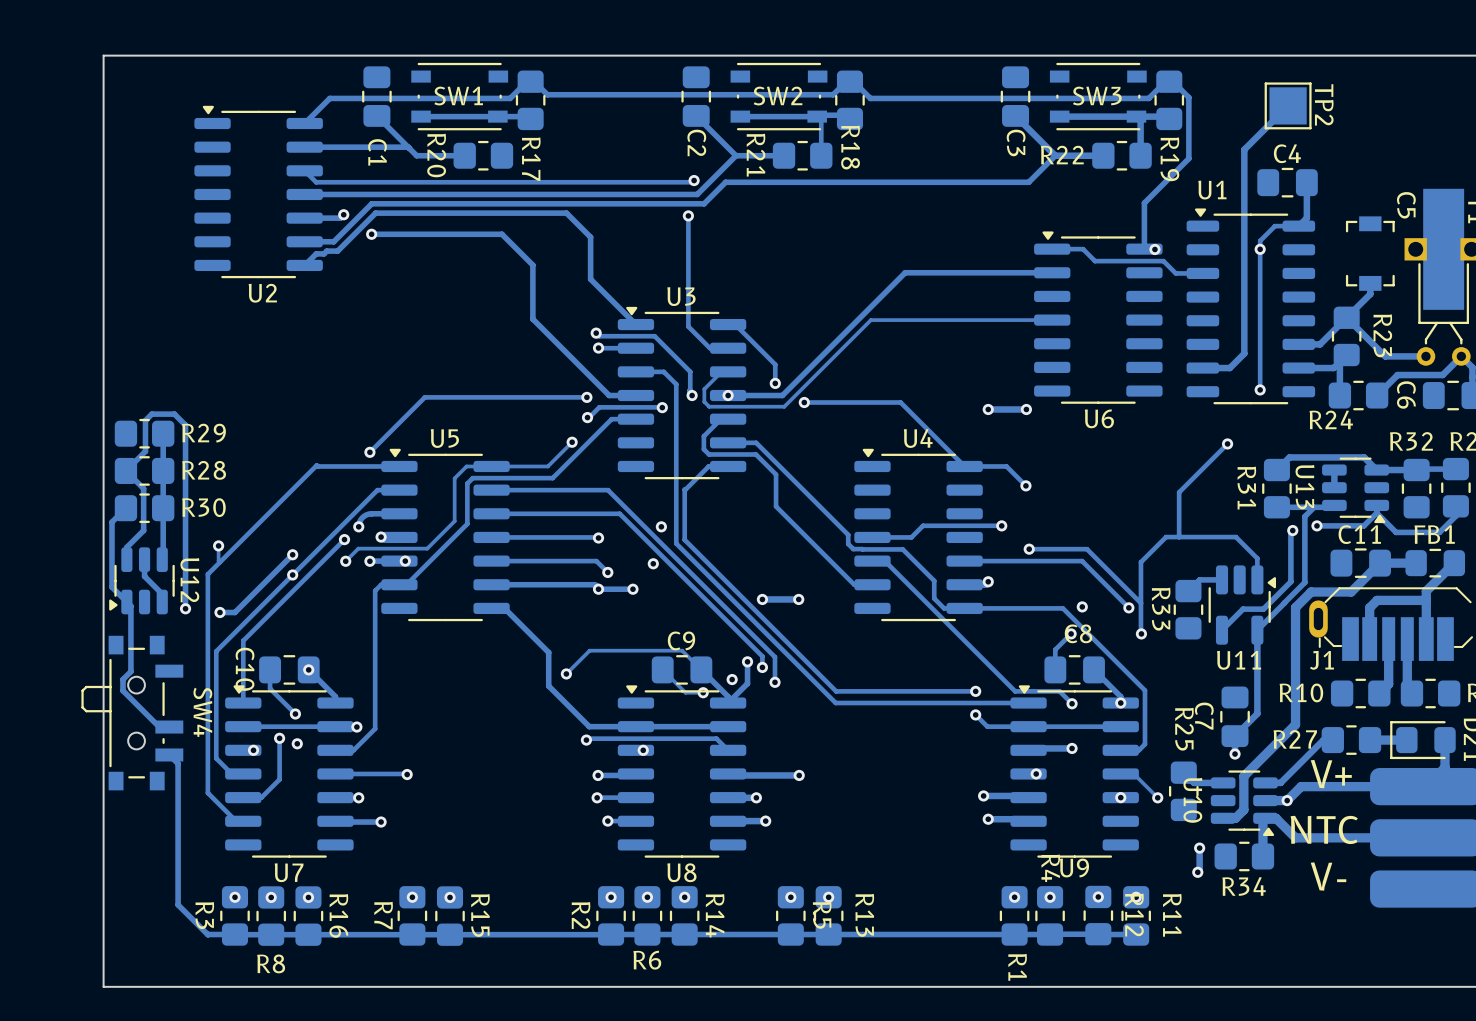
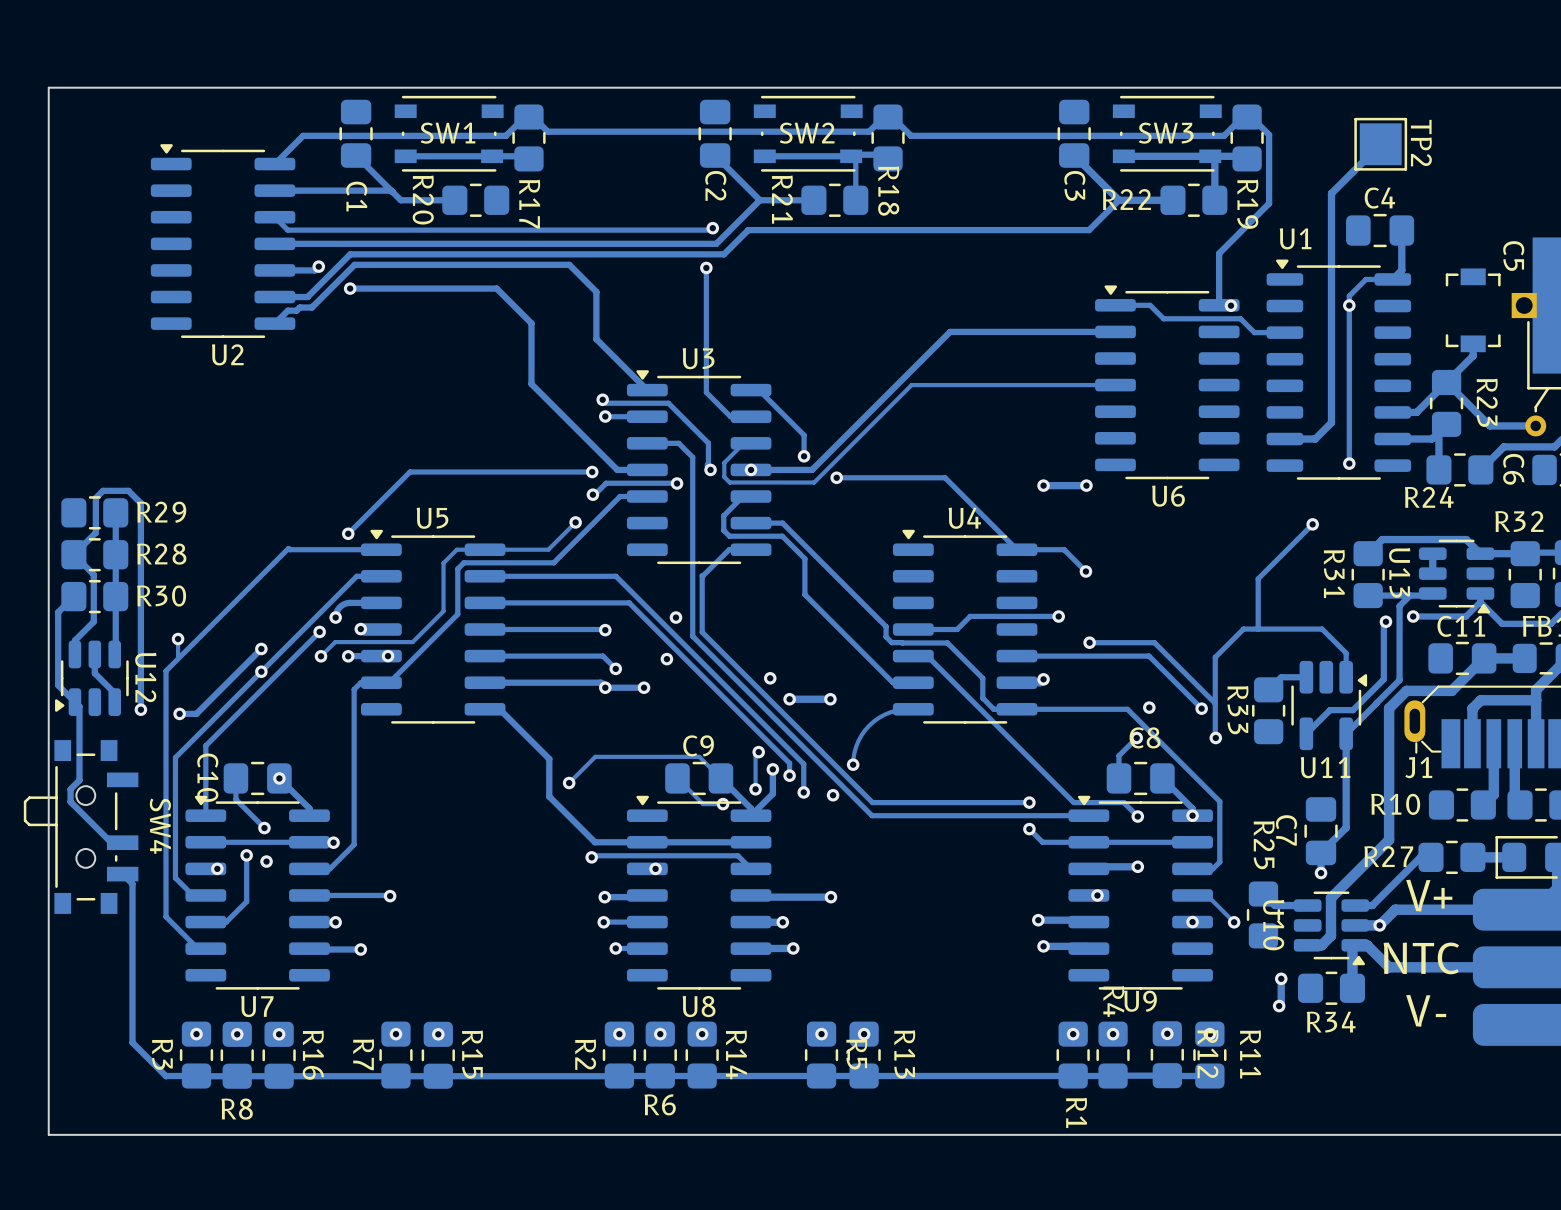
via: none -> (770, 678)
track: none -> (913, 709) (890, 712) (869, 725) (856, 746) (853, 764)
track: none -> (758, 752) (755, 754) (755, 789)
via: none -> (758, 752)
via: none -> (853, 764)
via: none -> (833, 795)

